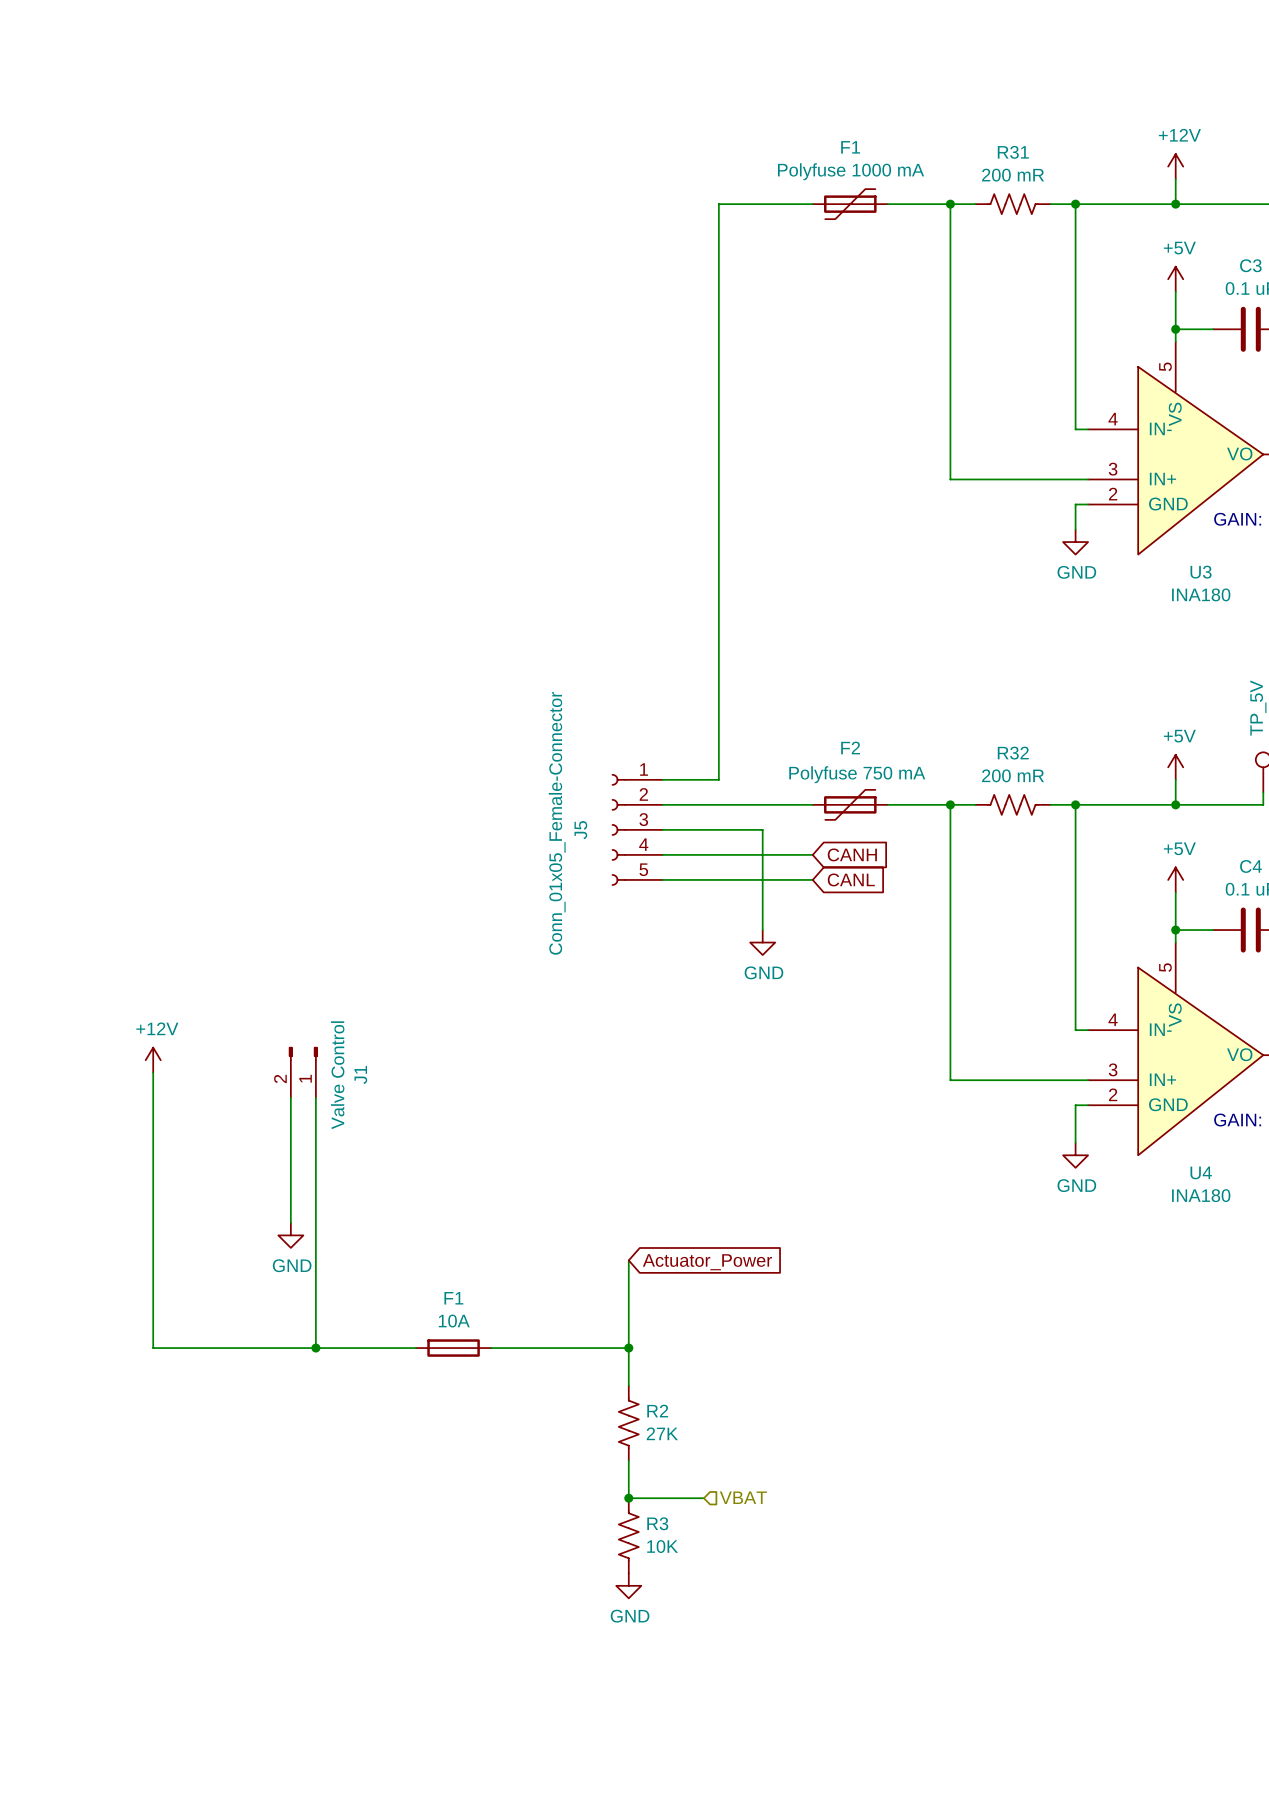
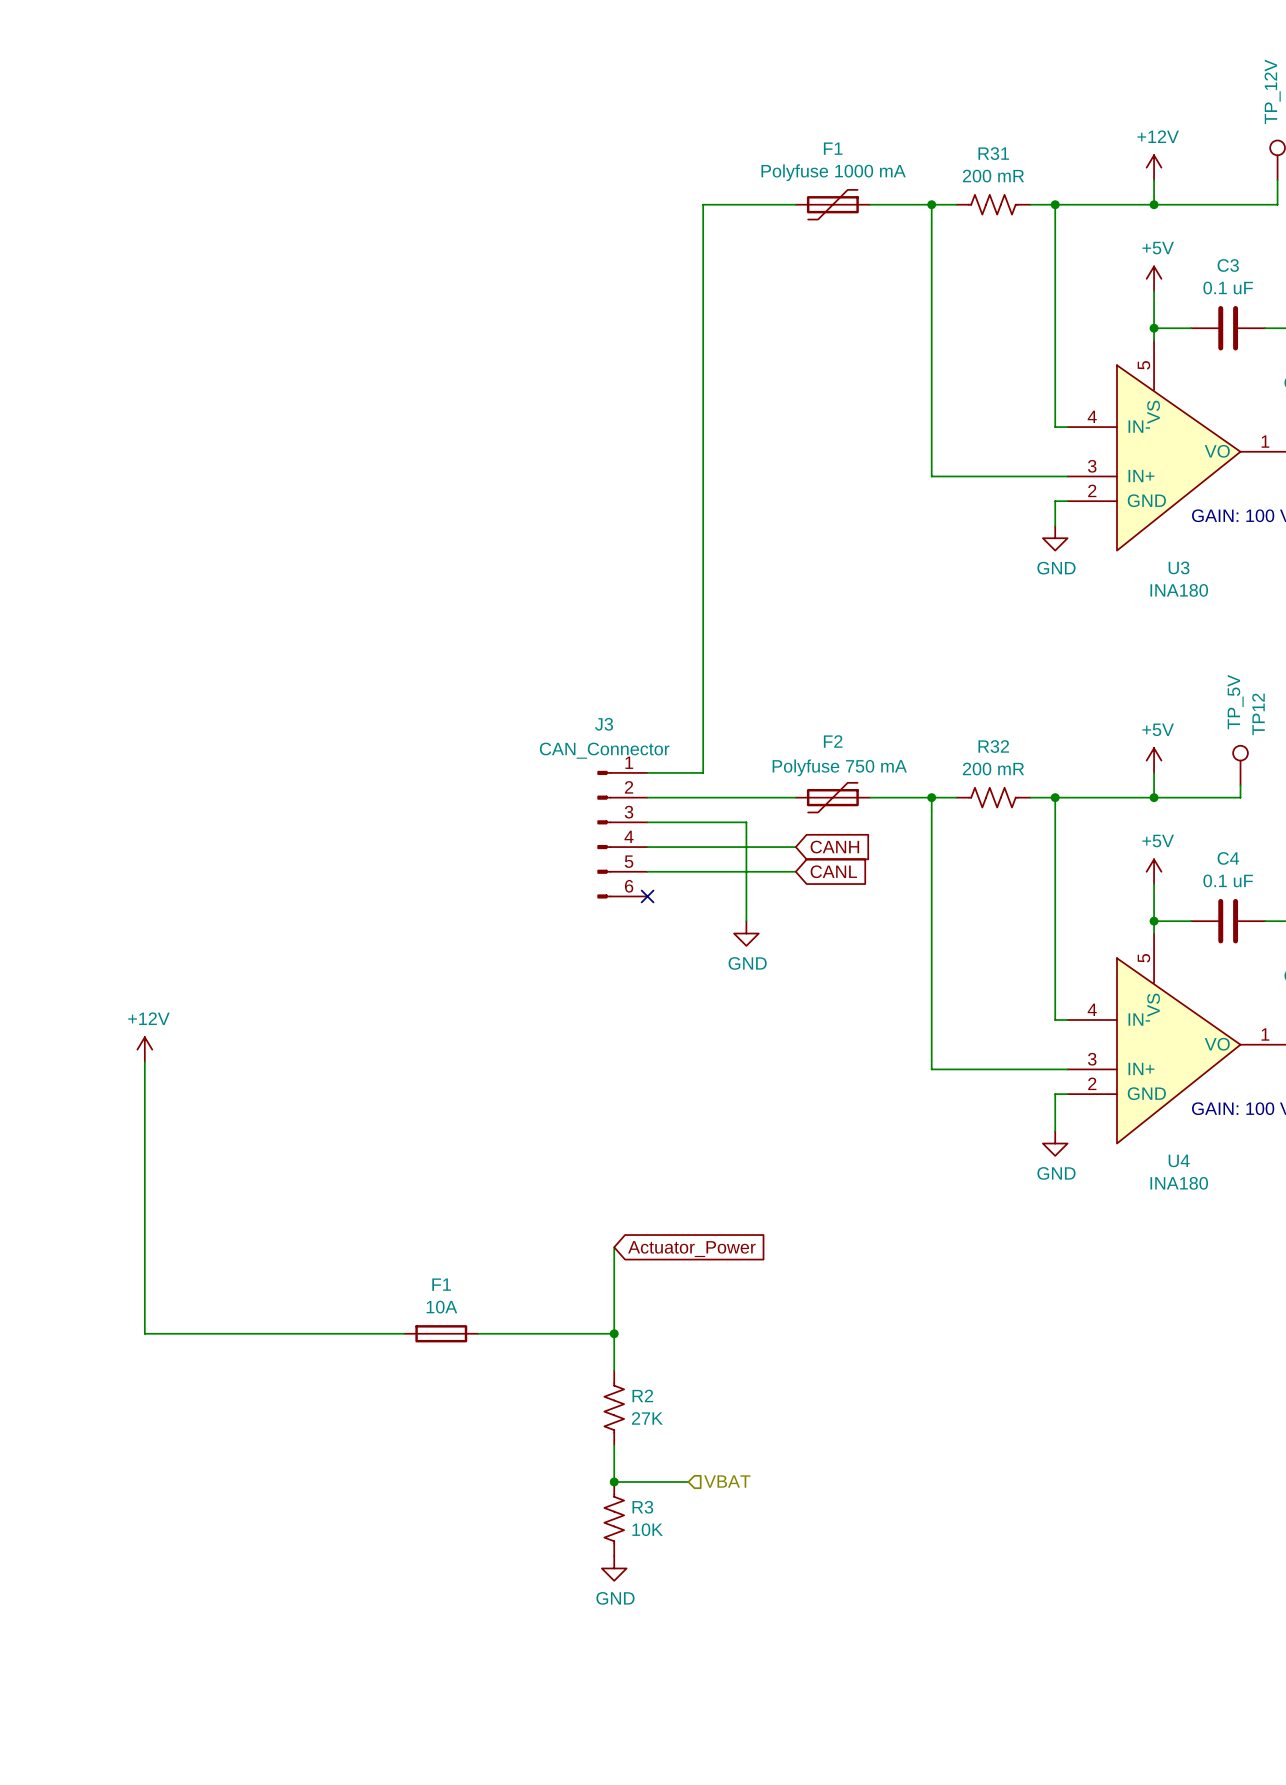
J5: Conn_01x05_Female-Connector (637, 829) -> none
J3: none -> CAN_Connector (622, 834)
no-connect mark: none -> (647, 896)
J1: Valve Control (303, 1072) -> none
wire: (290, 1097) (290, 1222) -> none
wire: (315, 1097) (315, 1348) -> none
power symbol: GND (290, 1235) -> none
junction: (315, 1348) -> none

